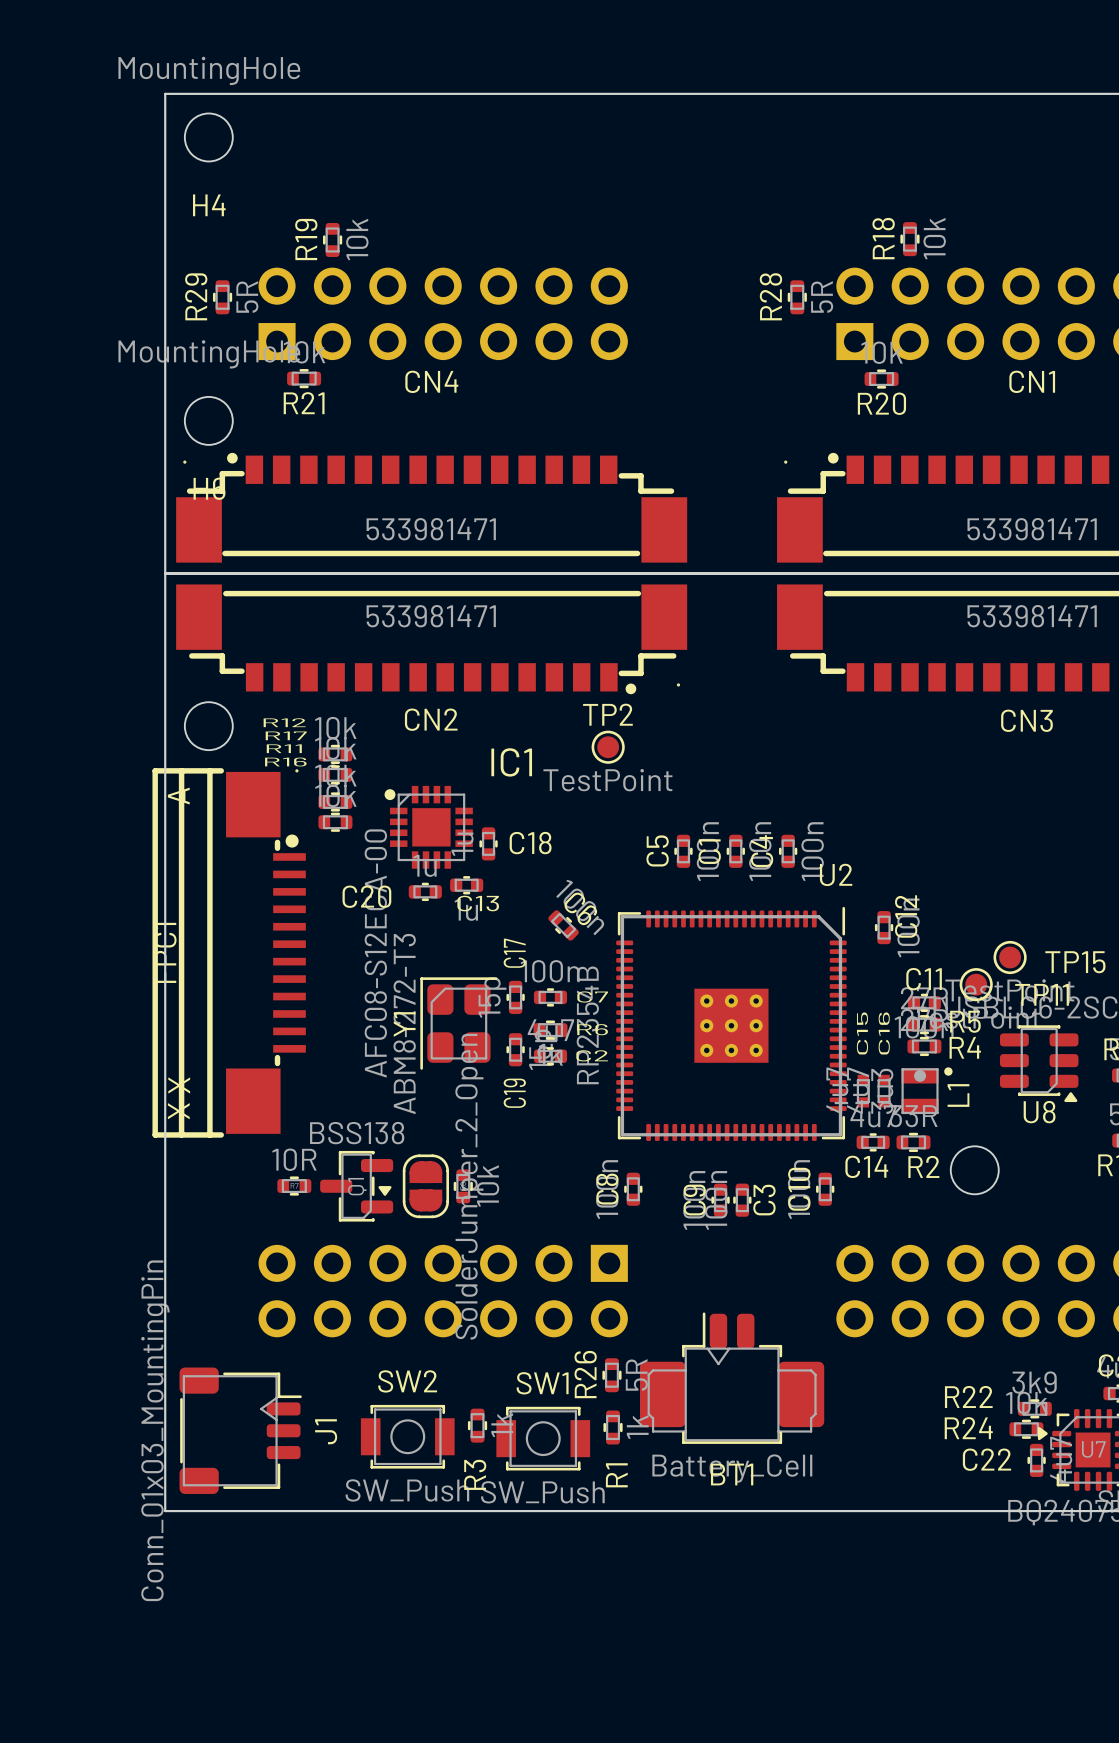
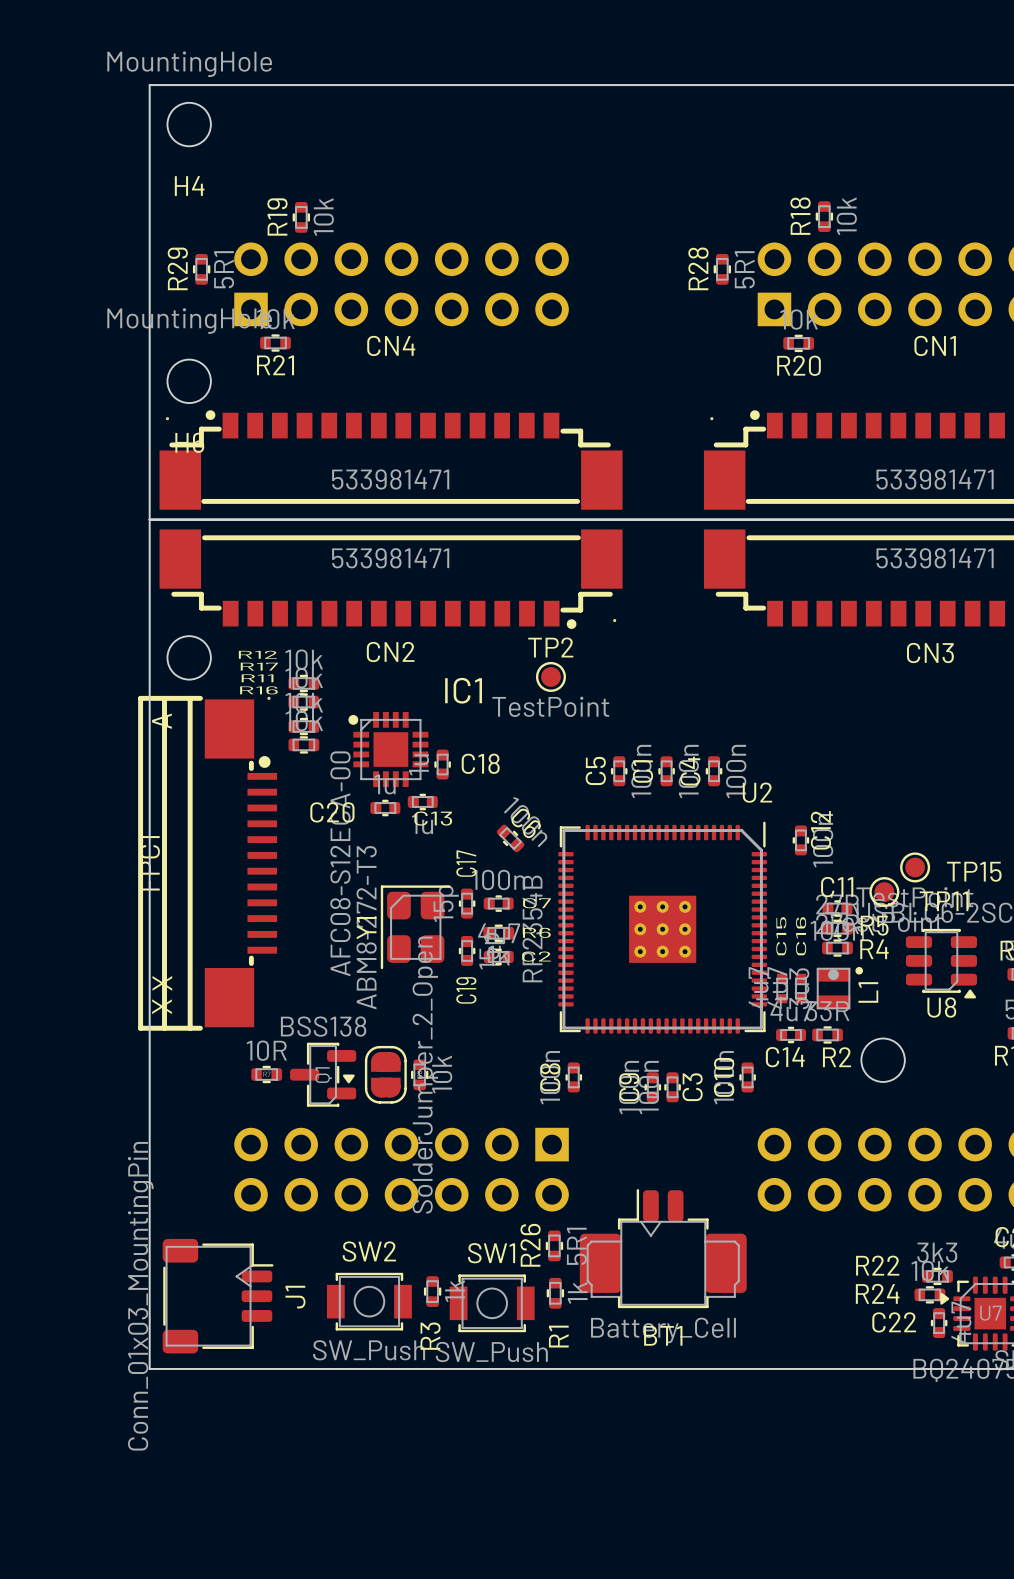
R29 value: 5R (247, 297) -> 5R1 (224, 269)
R28 value: 5R (822, 297) -> 5R1 (744, 269)
R26 value: 5R (636, 1374) -> 5R1 (576, 1246)
R22 value: 3k9 (1034, 1382) -> 3k3 (937, 1252)

